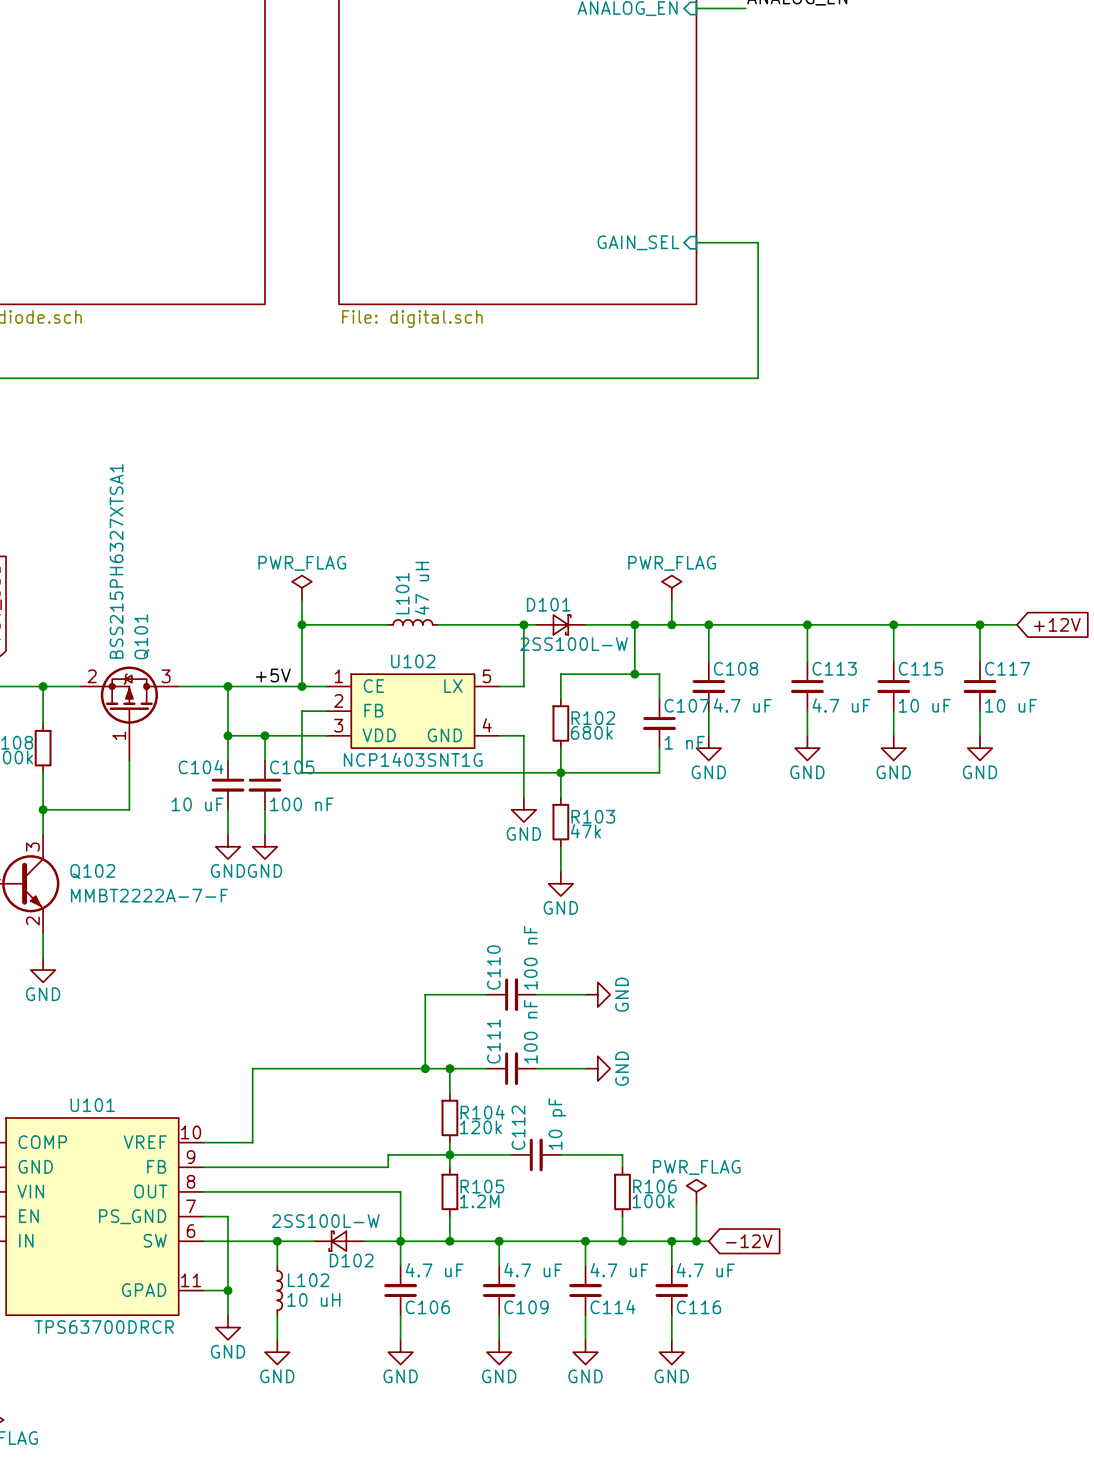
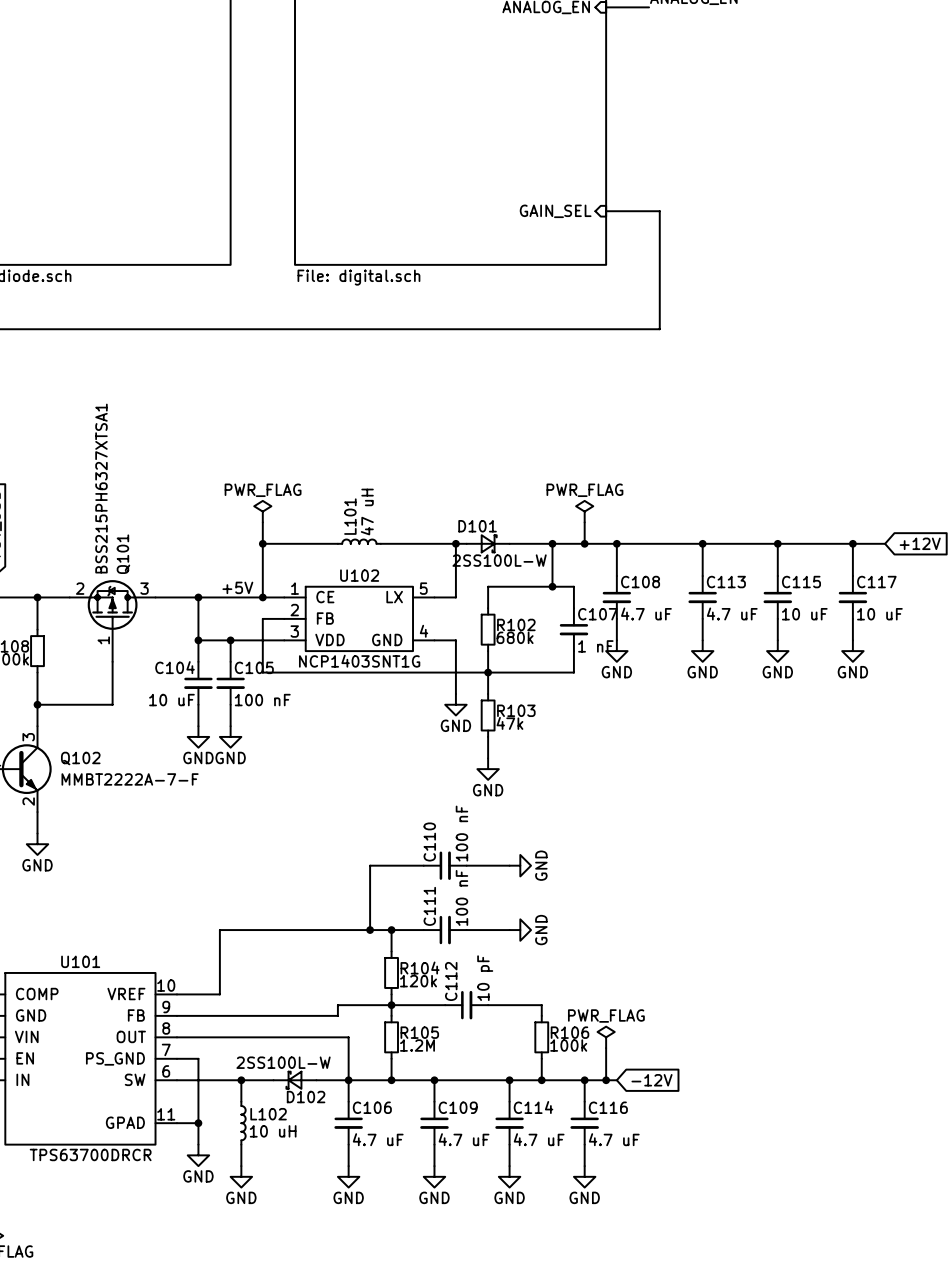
C106 value position: 4.7 uF (434, 1270) -> 4.7 uF (378, 1139)
C109 value position: 4.7 uF (533, 1270) -> 4.7 uF (464, 1139)
C114 value position: 4.7 uF (619, 1270) -> 4.7 uF (539, 1139)
C116 value position: 4.7 uF (705, 1270) -> 4.7 uF (614, 1139)
C106 rotation: 0° (400, 1290) -> 180° (348, 1123)
C109 rotation: 0° (499, 1290) -> 180° (434, 1123)
C114 rotation: 0° (585, 1290) -> 180° (509, 1123)
C116 rotation: 0° (671, 1290) -> 180° (584, 1123)
C106 name position: C106 (427, 1307) -> C106 (372, 1107)
C109 name position: C109 (526, 1307) -> C109 (458, 1107)
C114 name position: C114 (613, 1307) -> C114 (533, 1107)
C116 name position: C116 (699, 1307) -> C116 (608, 1107)

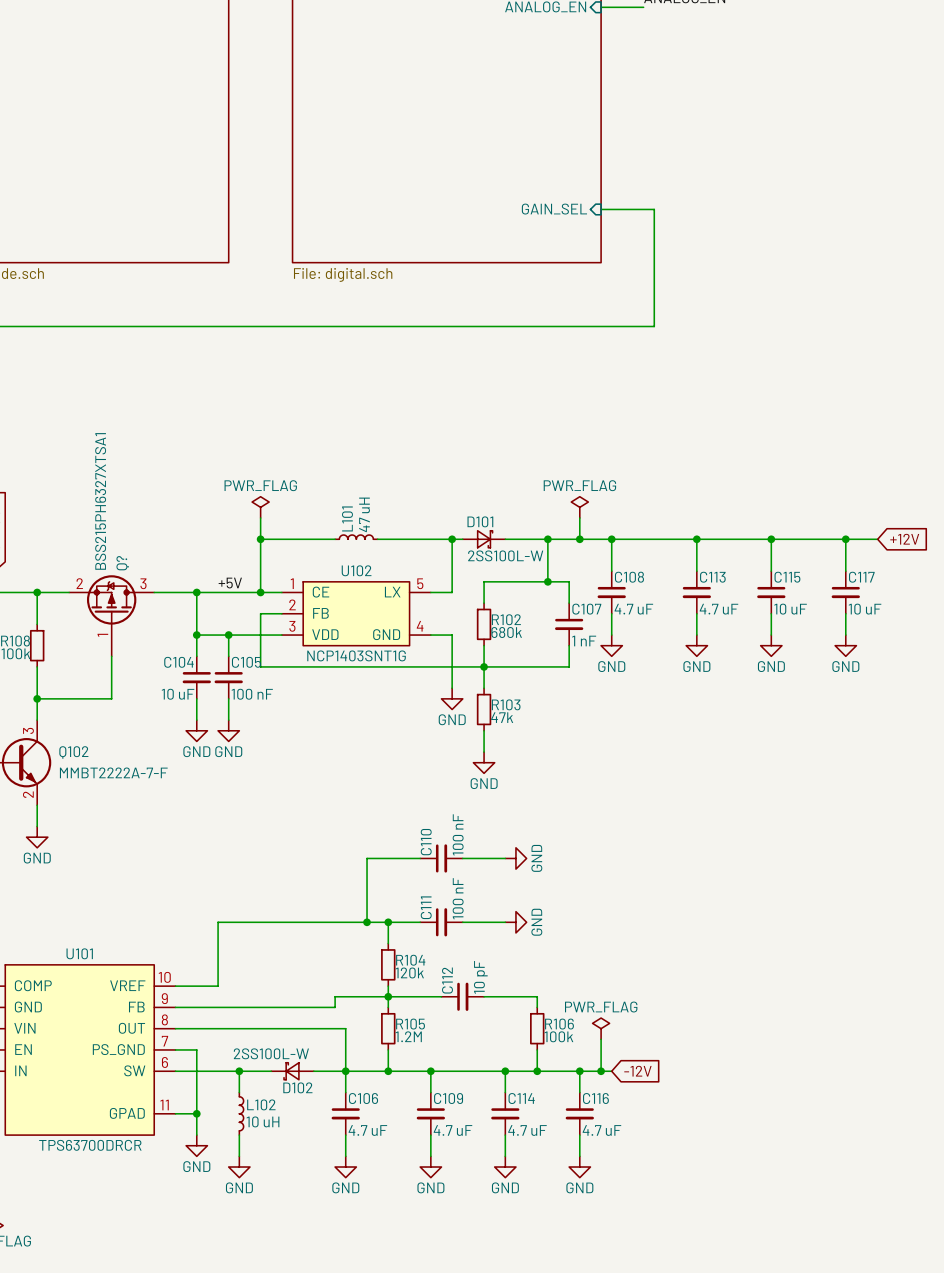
Q101 name: Q101 (123, 554) -> Q? (122, 563)

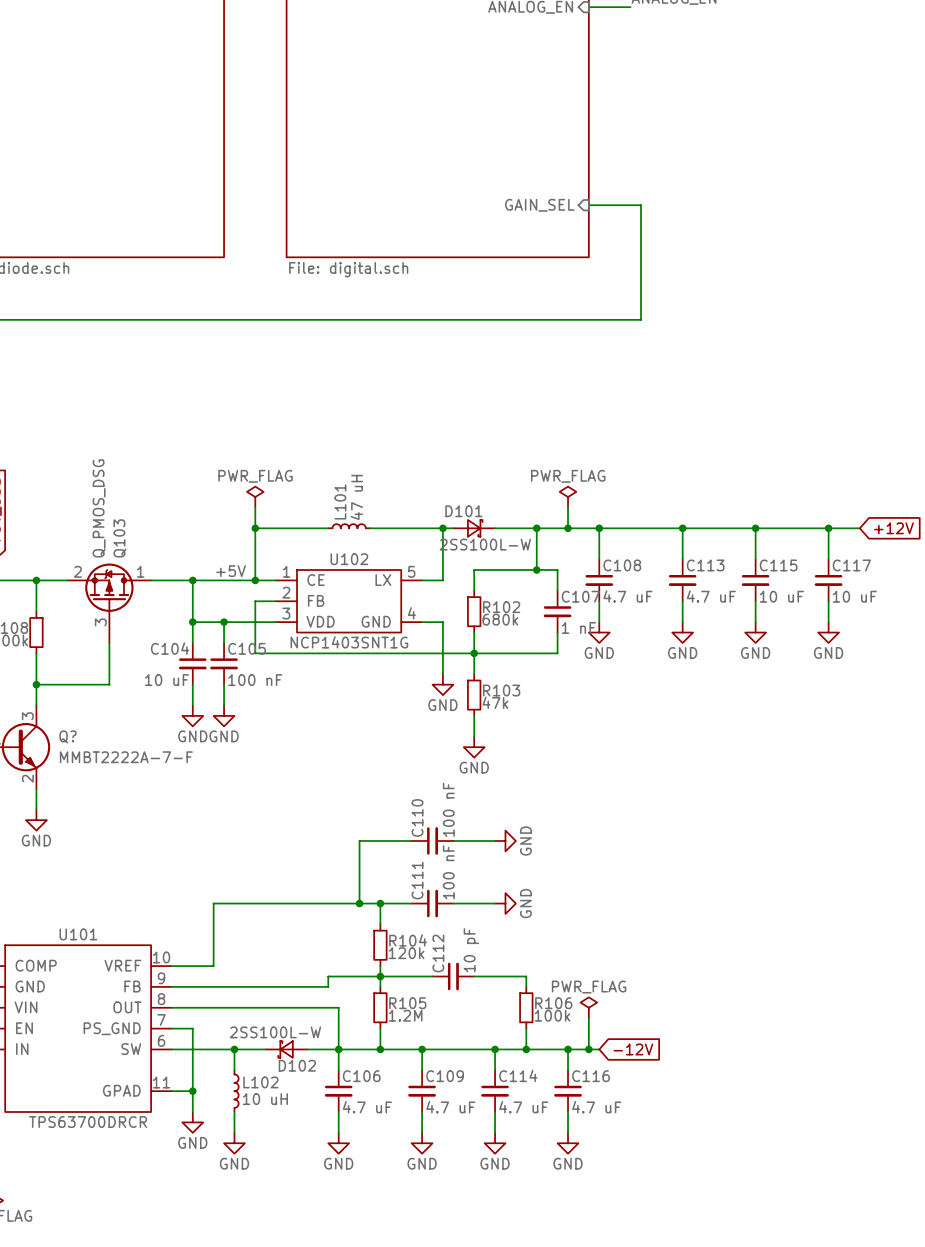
Q? value: BSS215PH6327XTSA1 (100, 501) -> Q_PMOS_DSG (99, 508)
Q? name: Q? (122, 563) -> Q103 (119, 538)
Q? pin number: 3 (143, 583) -> 1 (140, 571)
Q? pin number: 1 (102, 635) -> 3 (100, 622)
Q102 name: Q102 (73, 752) -> Q? (68, 736)

